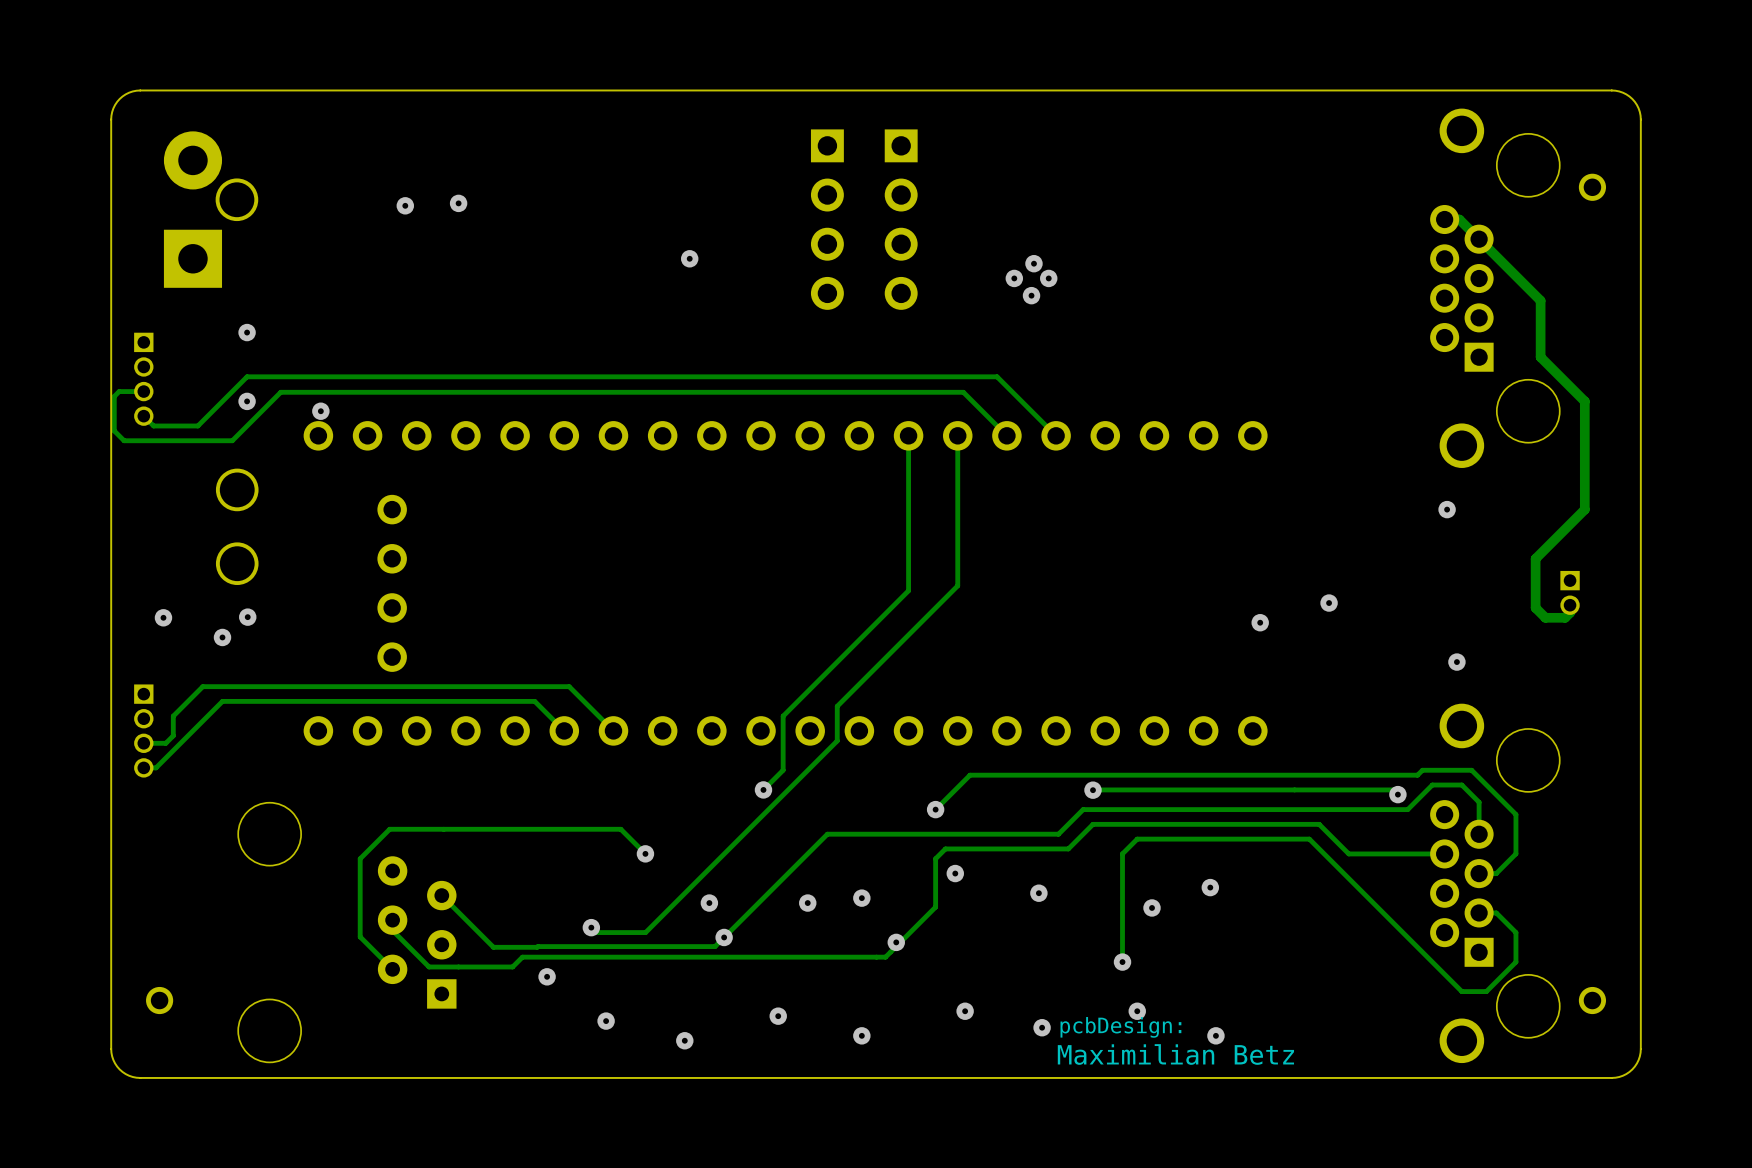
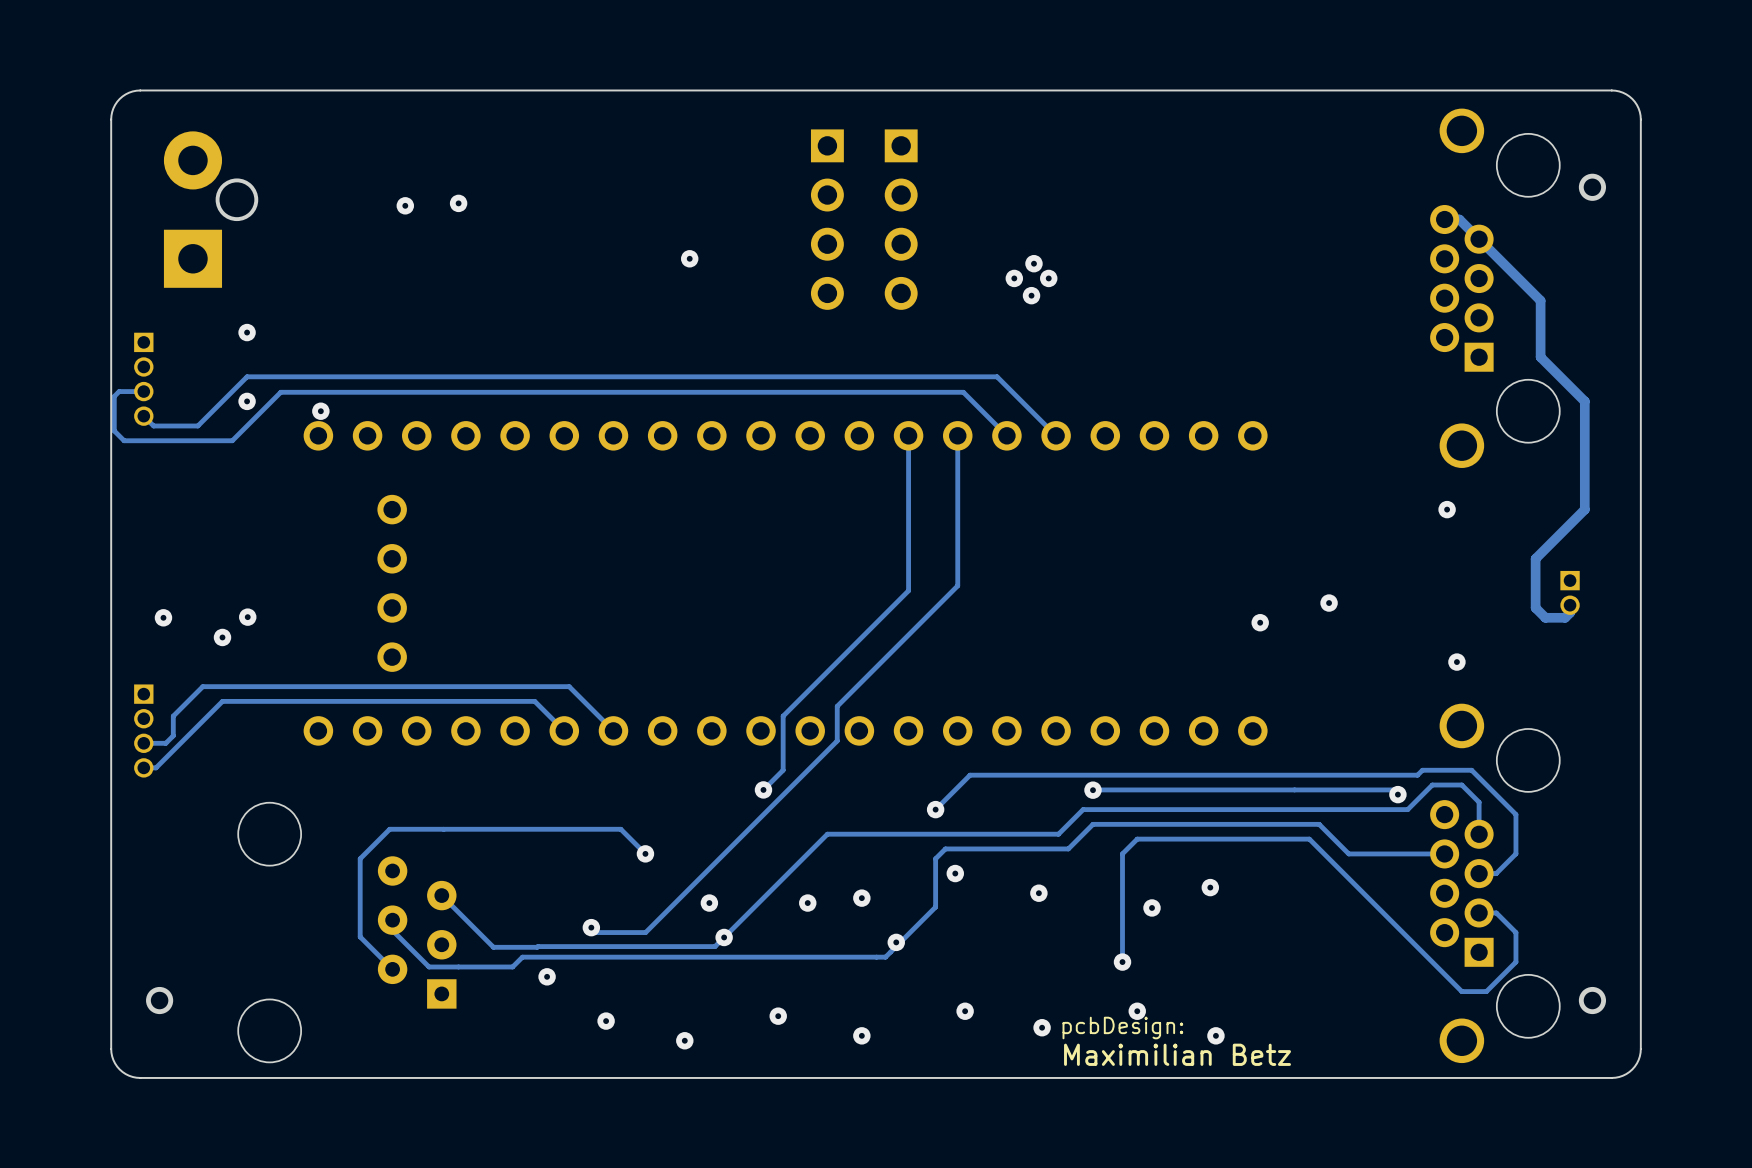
round board edge: [215, 468, 259, 512] -> none
round board edge: [215, 542, 259, 586] -> none

